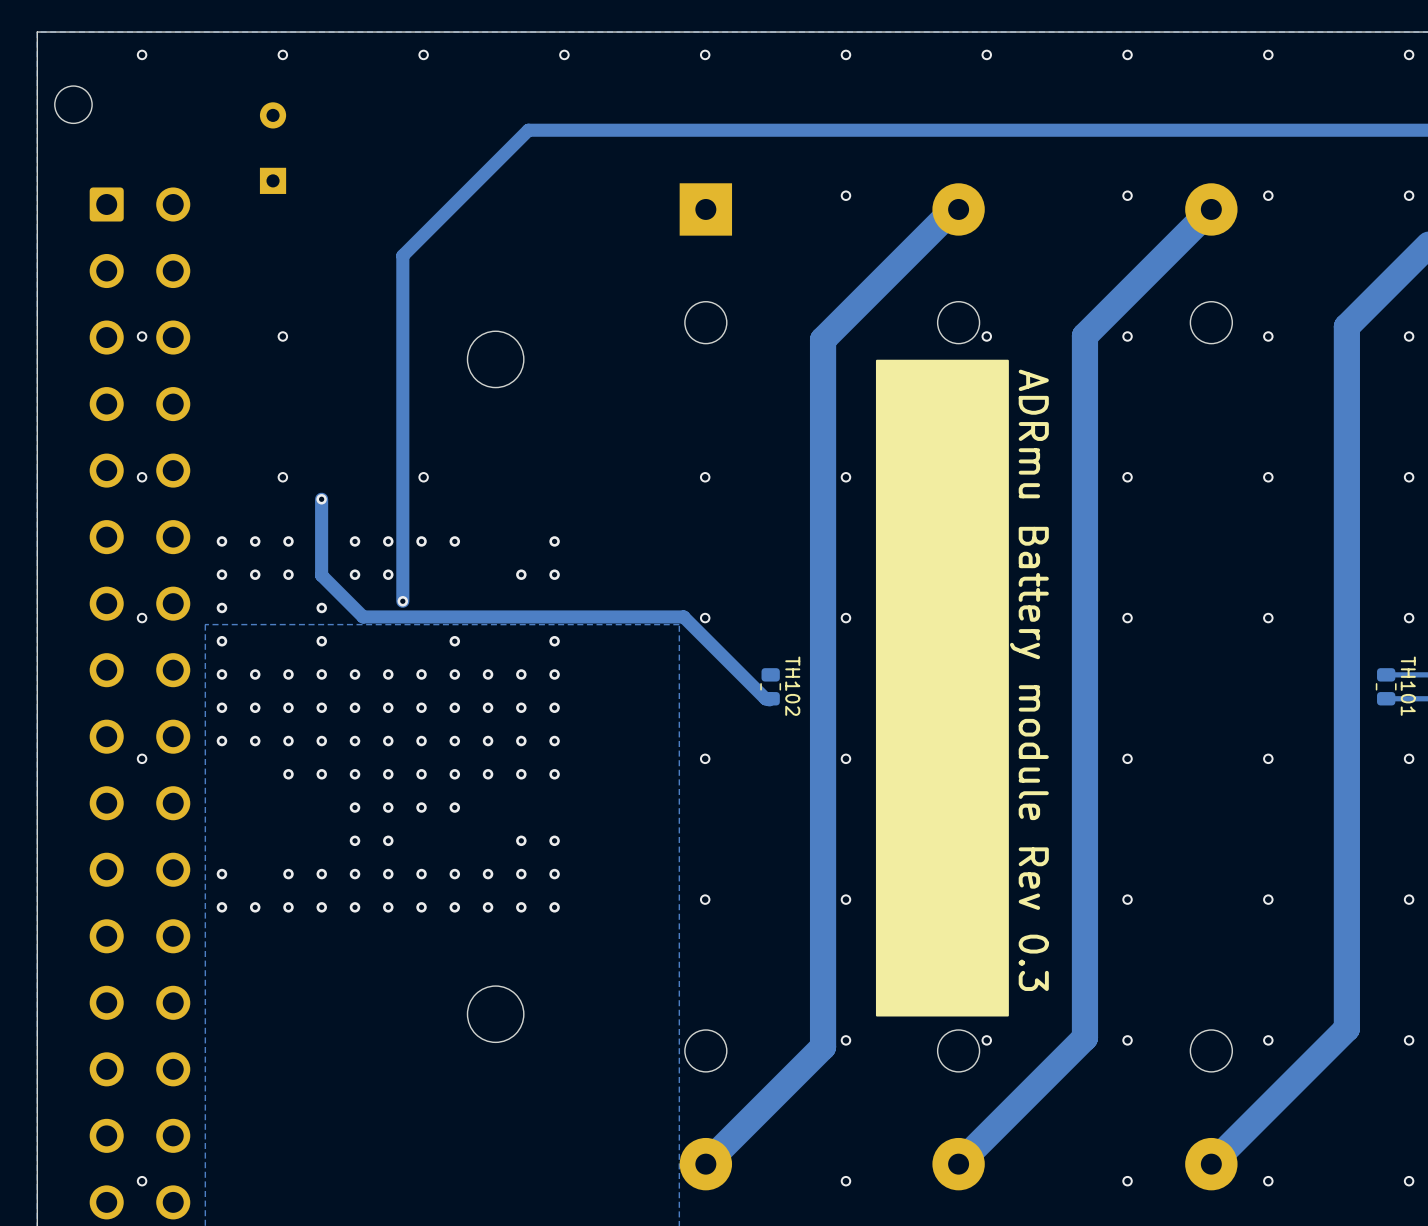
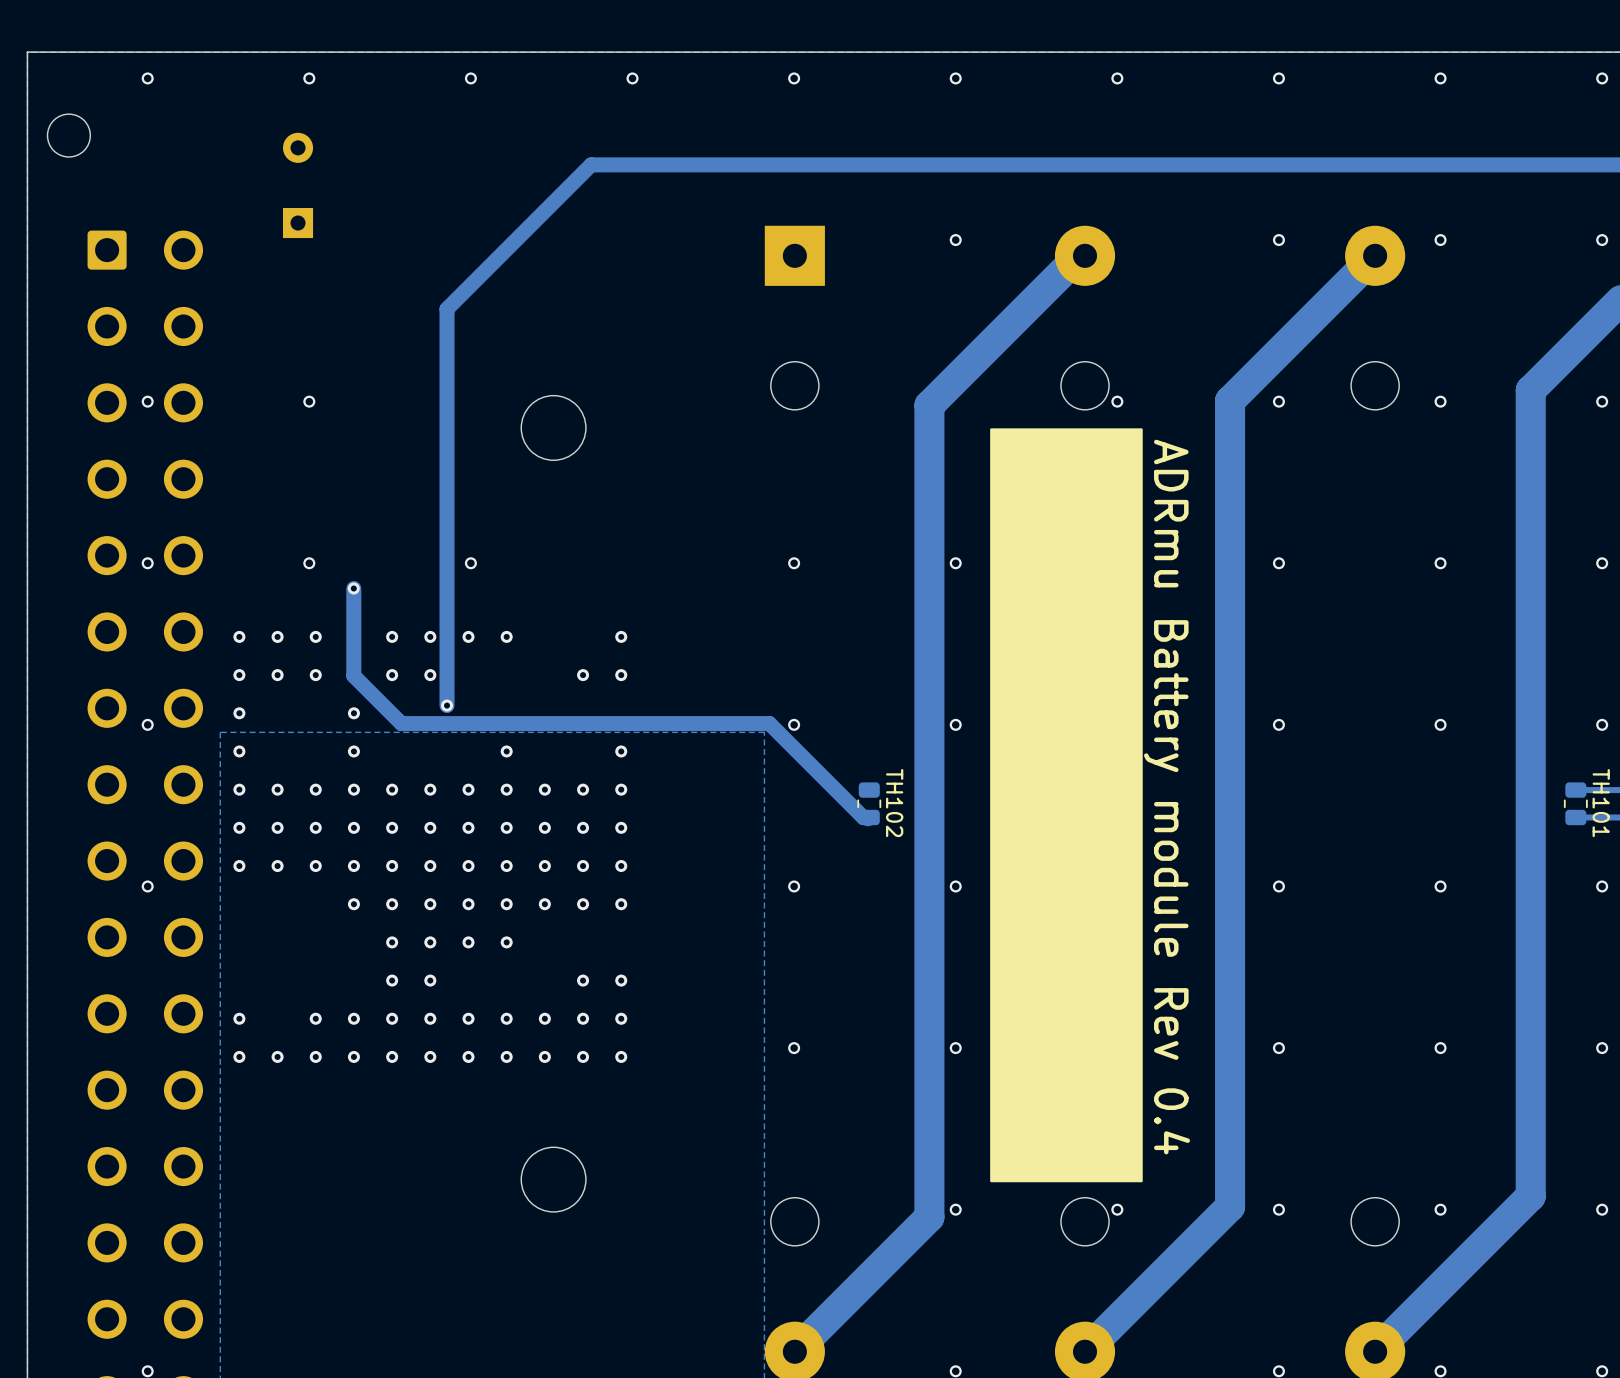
text: ADRmu Battery module Rev 0.3 (1029, 680) -> ADRmu Battery module Rev 0.4 (1167, 797)
via: (288, 774) -> none

